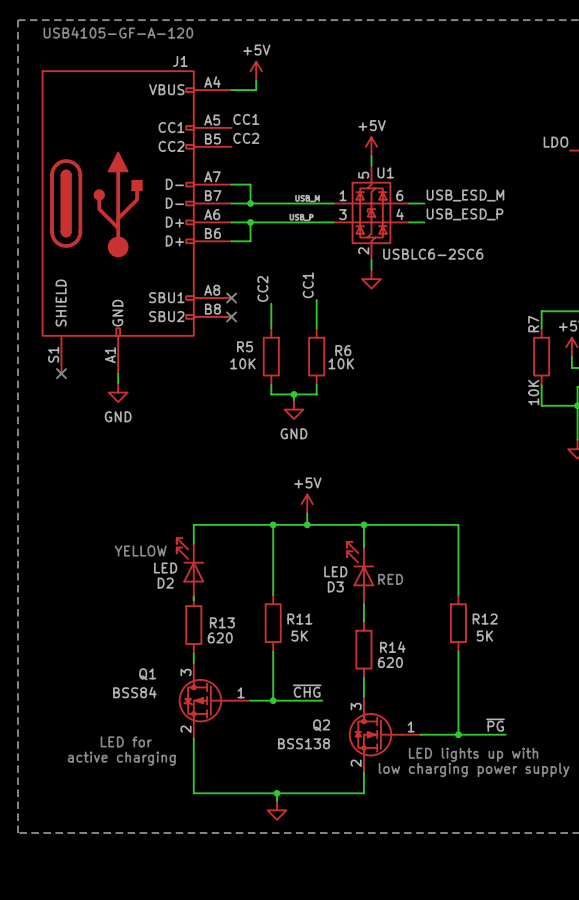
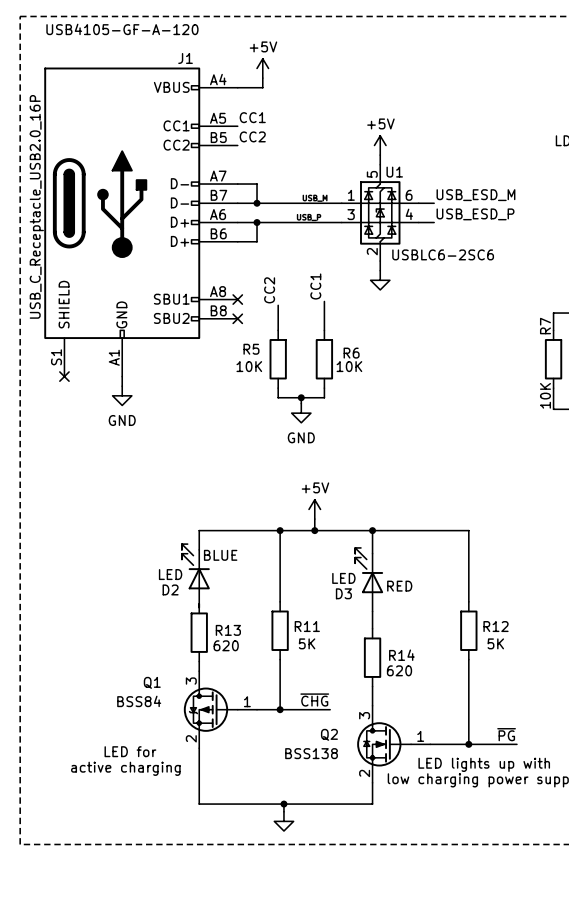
J1 value: none -> USB_C_Receptacle_USB2.0_16P (36, 206)
text: none -> BLUE (220, 555)
text: YELLOW (140, 551) -> none

